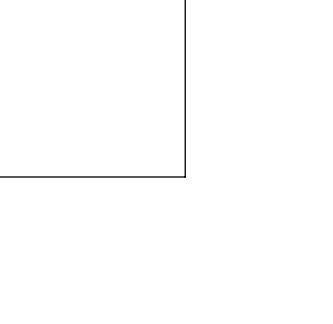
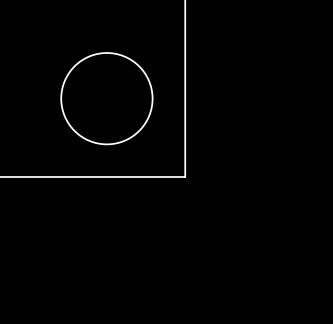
round board edge: none -> [60, 52, 154, 146]

